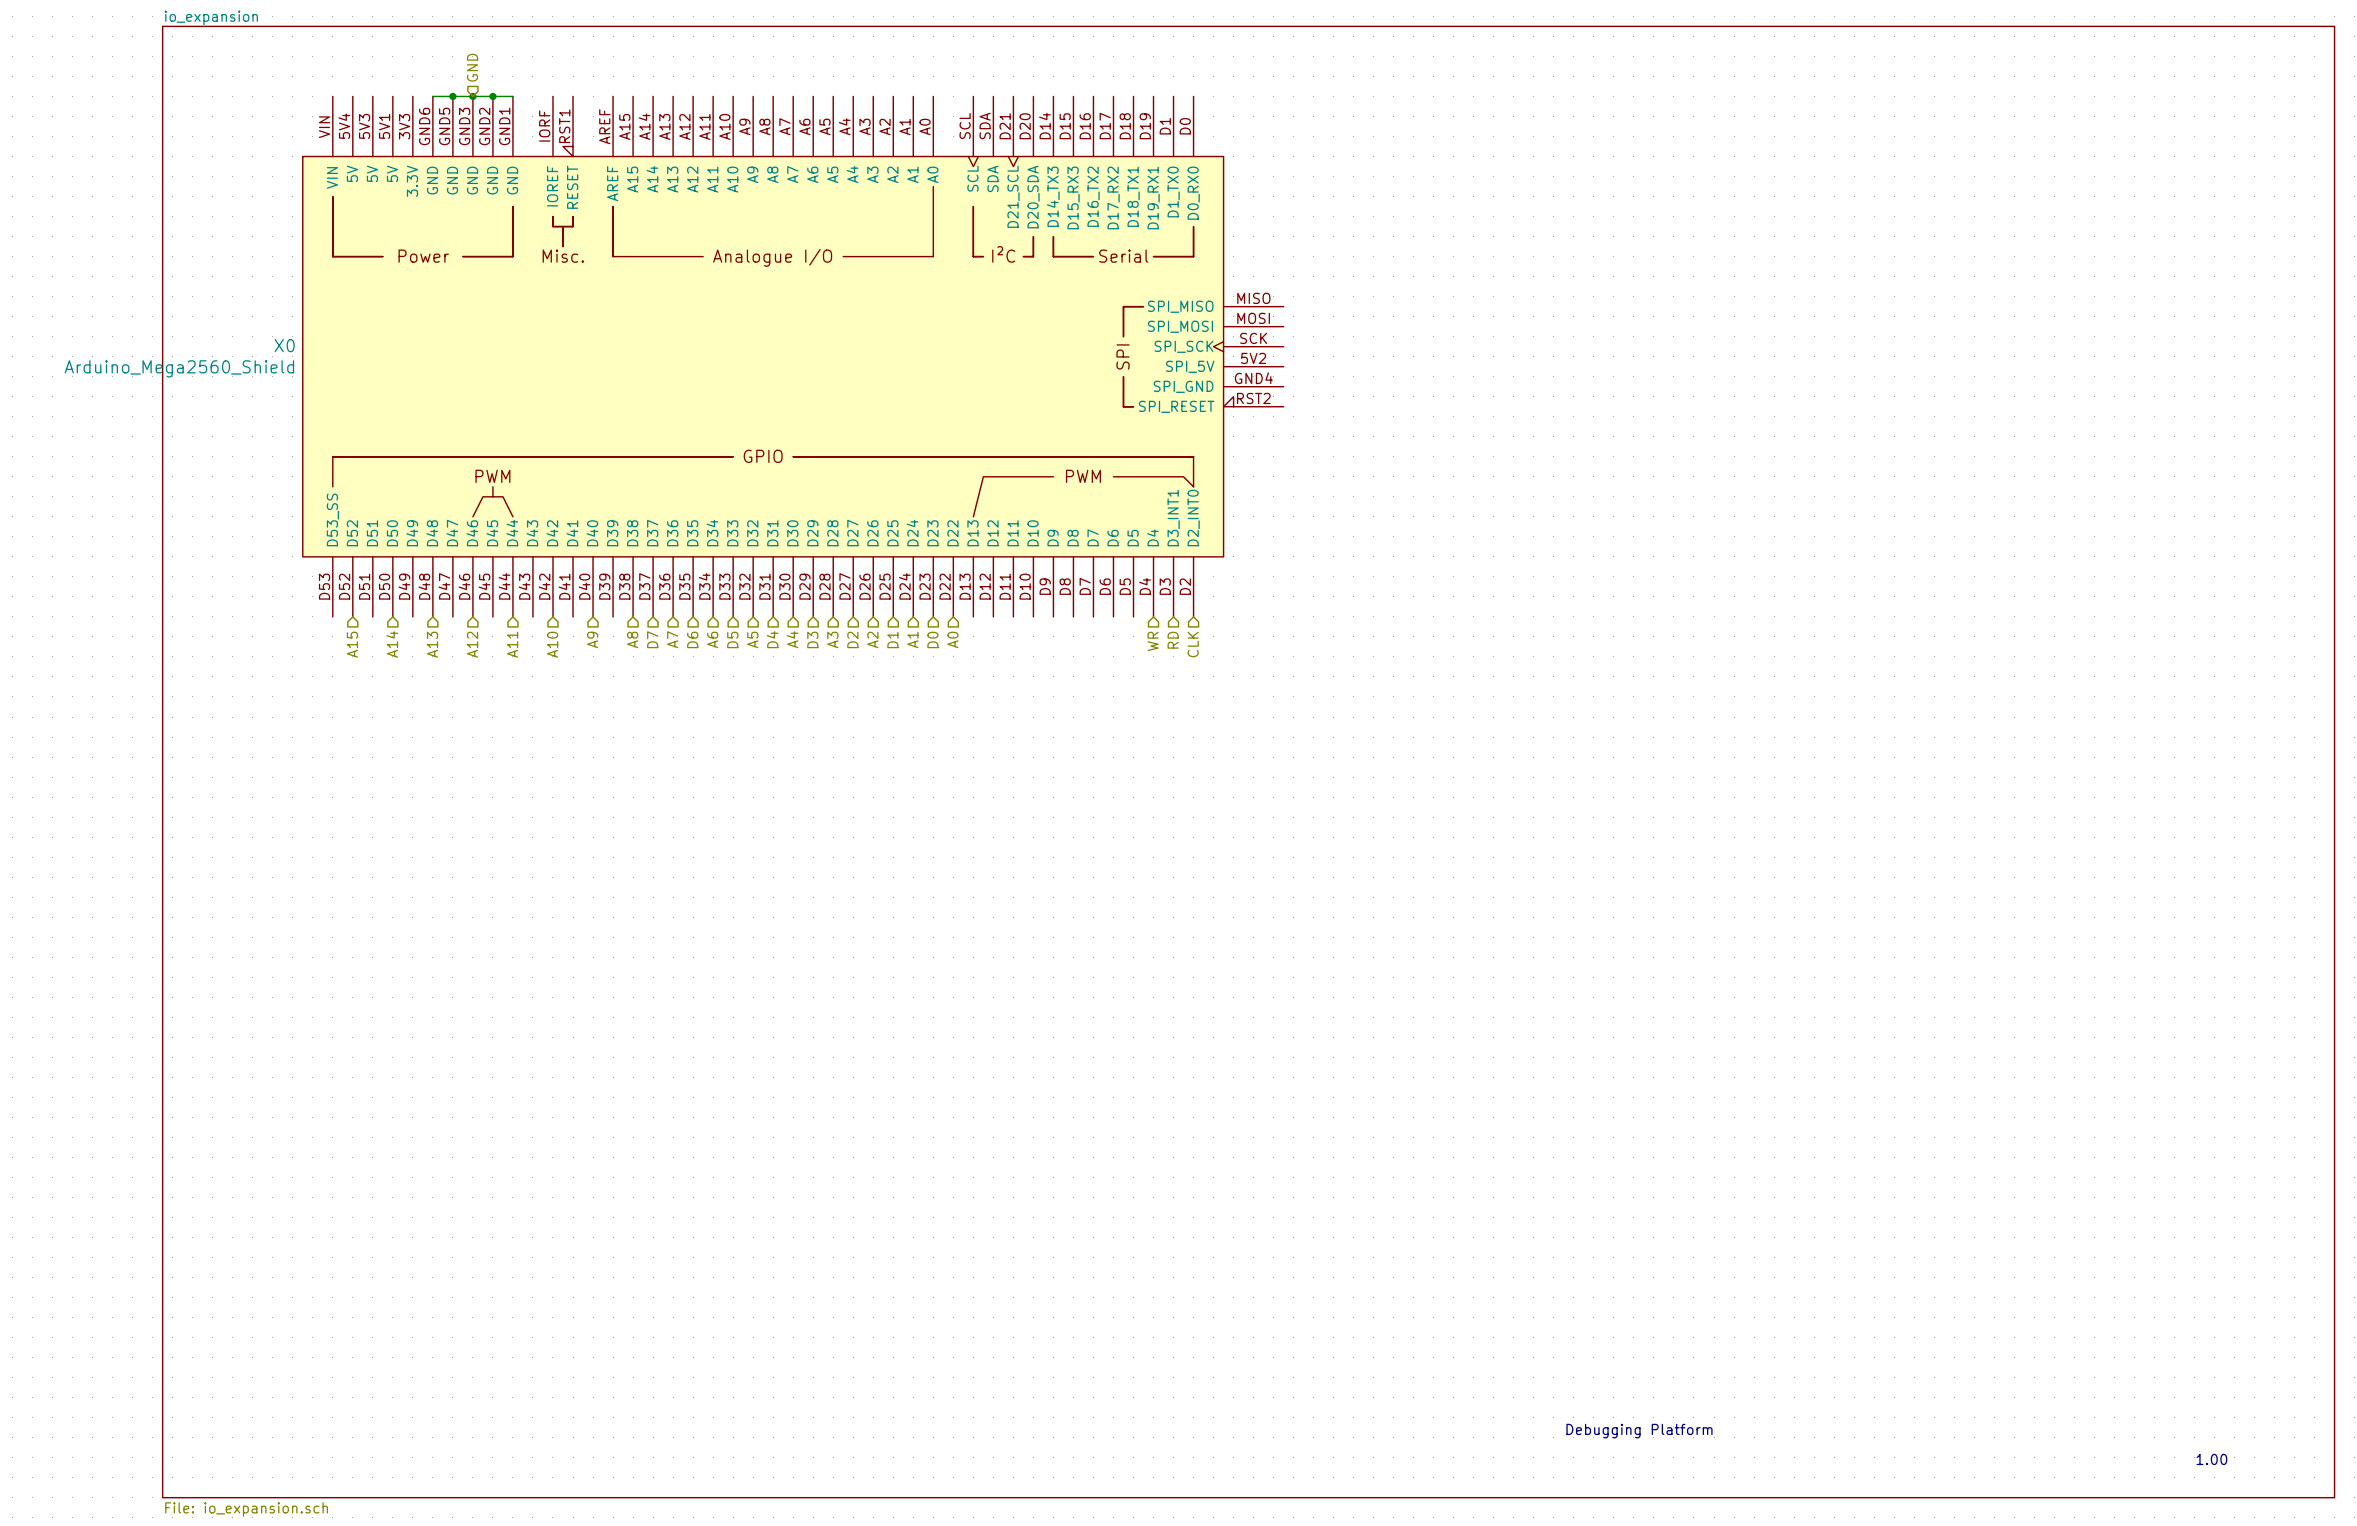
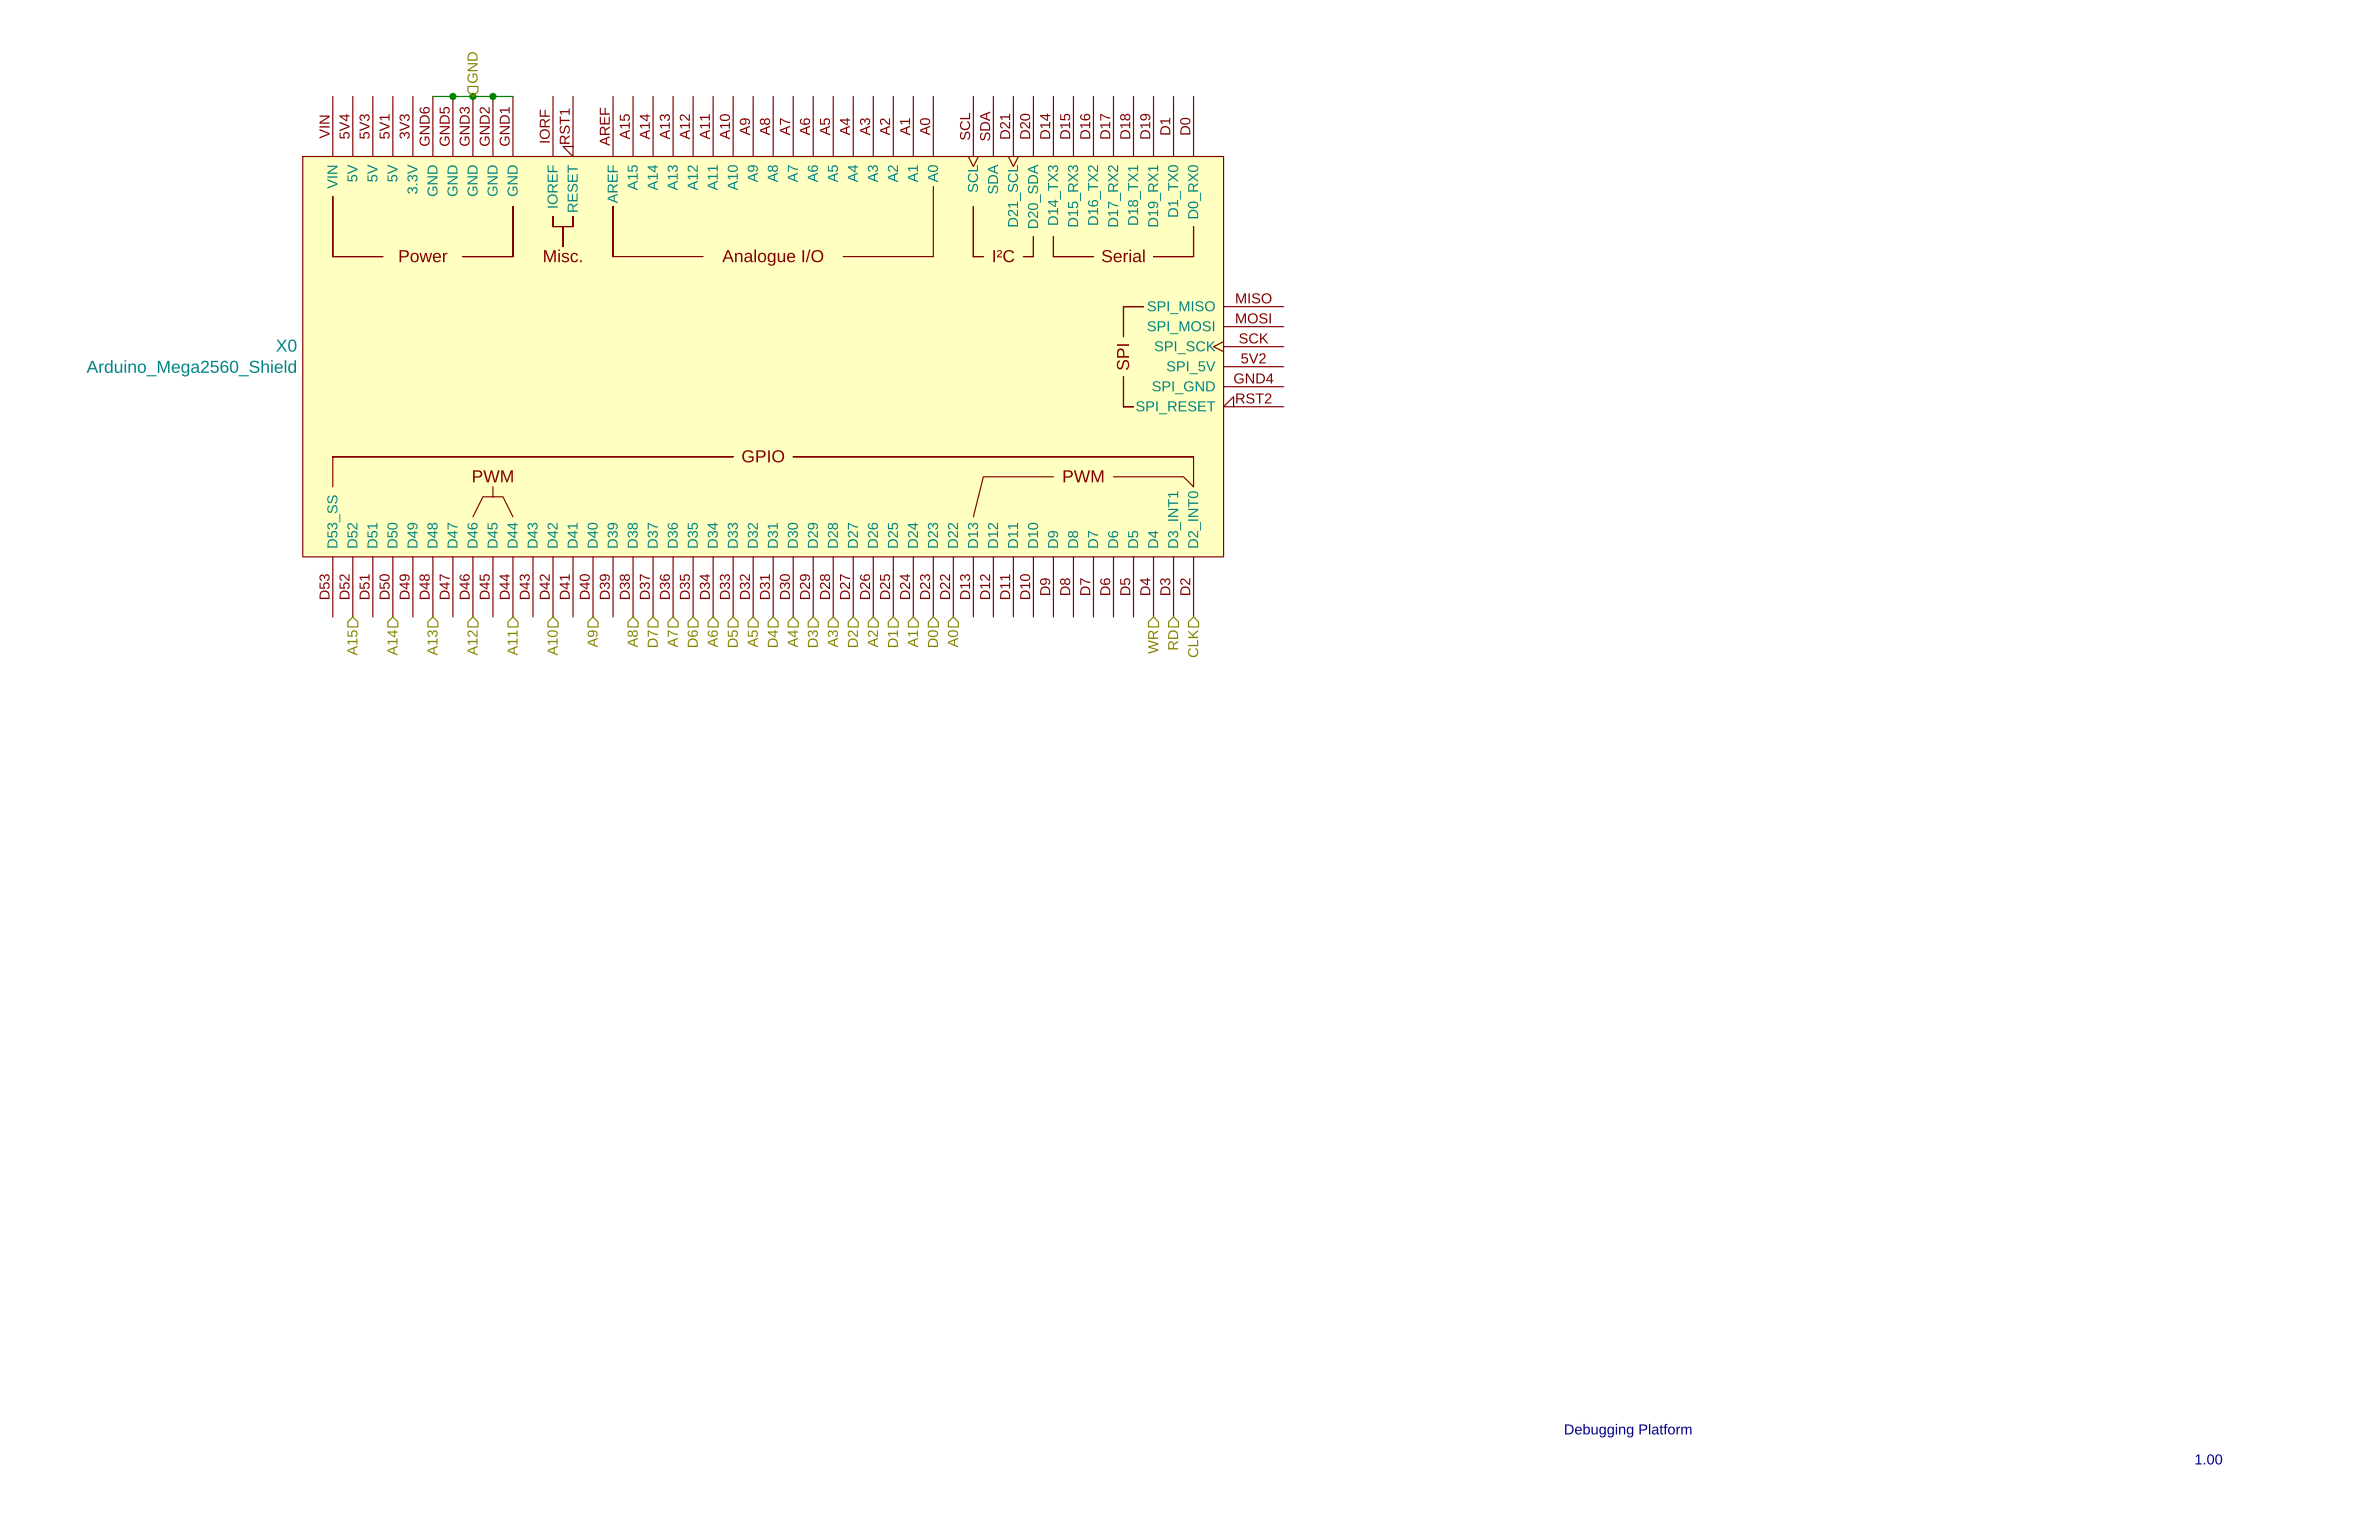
sheet io_expansion: File: io_expansion.sch (1248, 762) -> none

